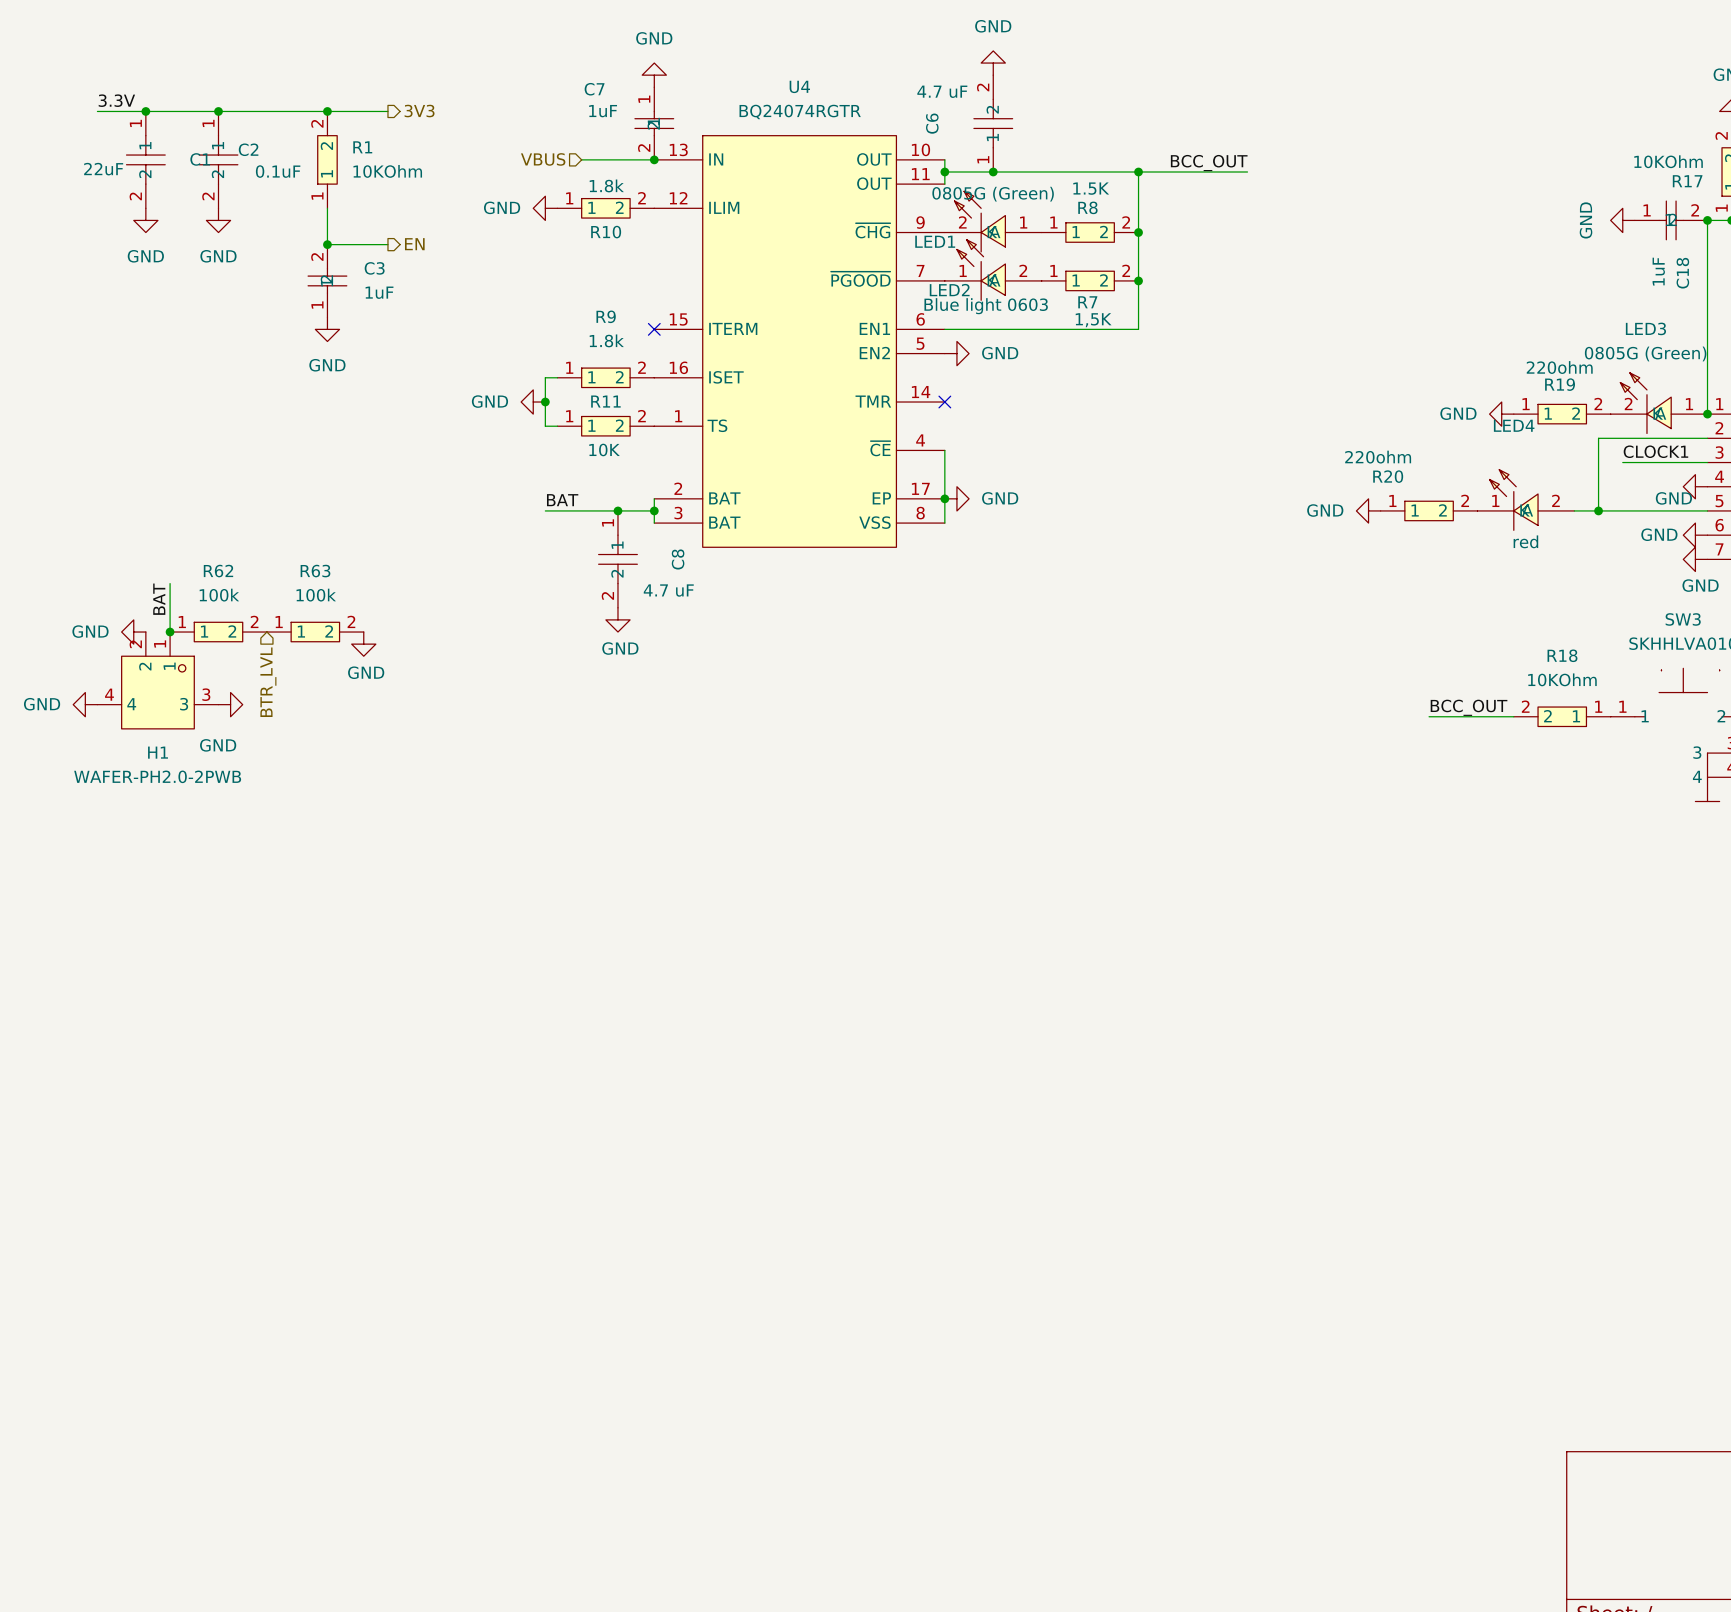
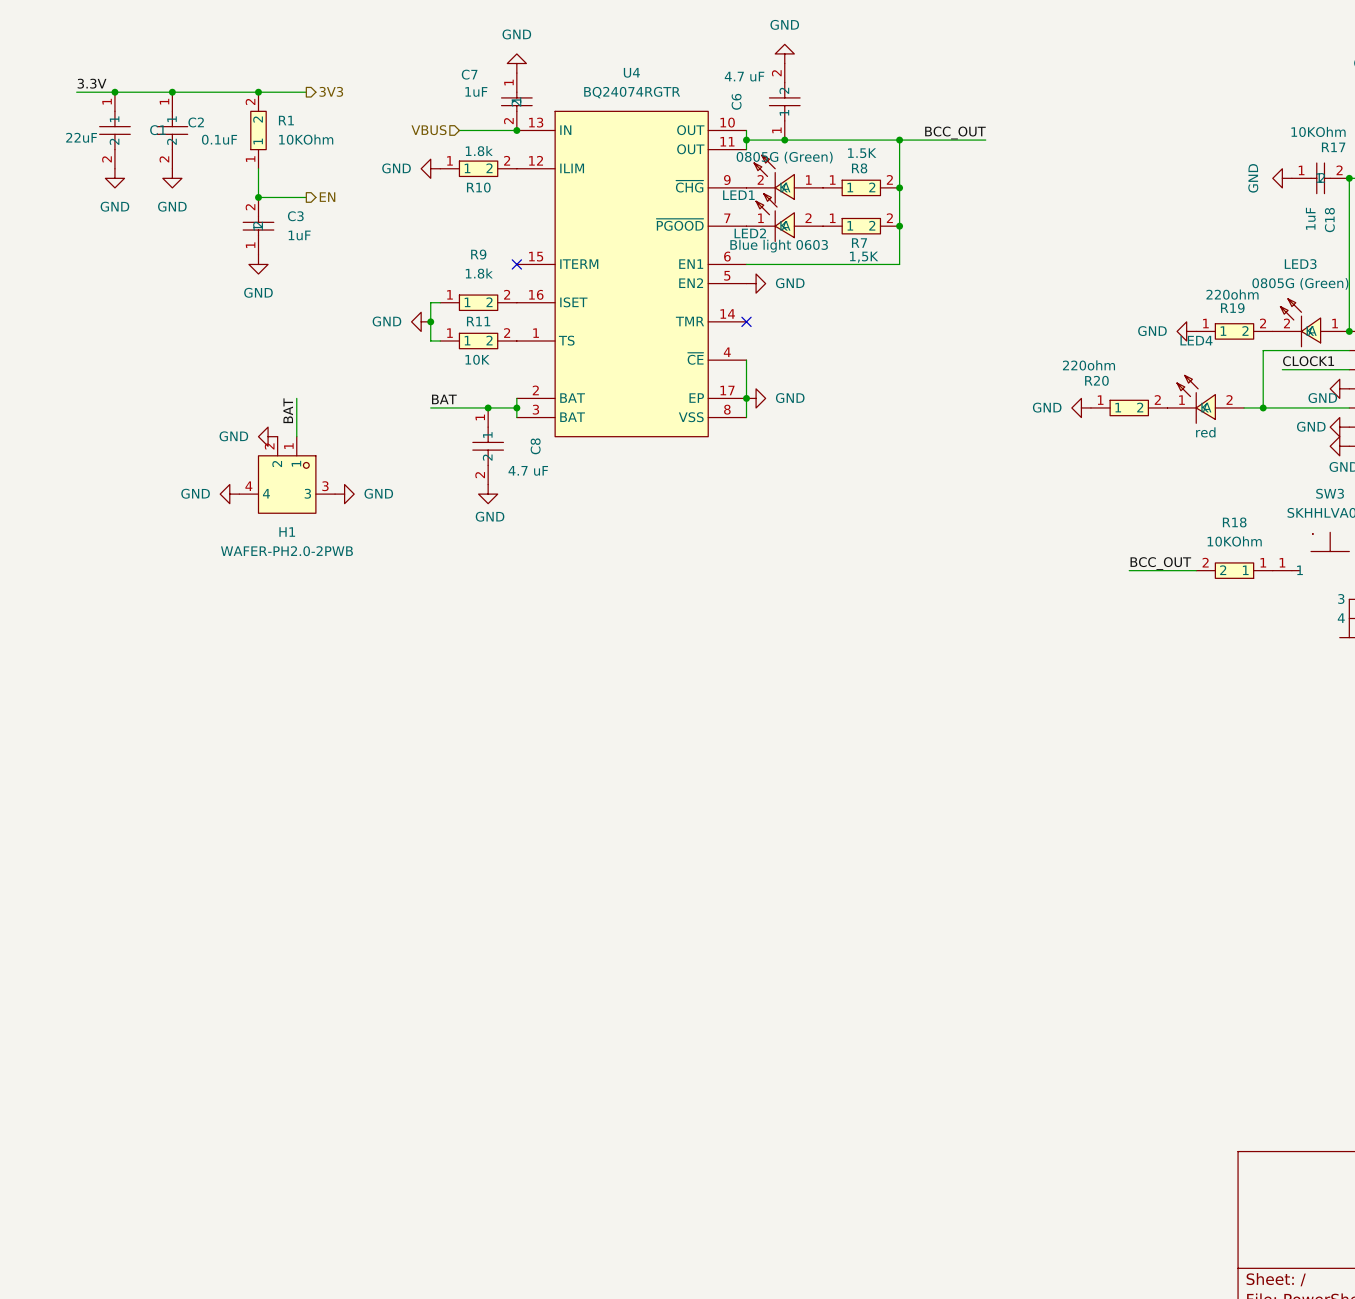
power symbol: none -> GND (268, 436)
wire: (170, 583) (170, 632) -> (296, 398) (296, 436)
label position: BAT (159, 599) -> BAT (288, 410)
power symbol: none -> GND (229, 494)
power symbol: none -> GND (344, 494)
power symbol: GND (133, 632) -> none
junction: (170, 632) -> none
R62: 100k (218, 632) -> none
R63: 100k (315, 632) -> none
power symbol: GND (363, 644) -> none
H1 position: (157, 680) -> (287, 474)
hierarchical label: BTR_LVL (268, 682) -> none
power symbol: GND (85, 704) -> none
power symbol: GND (230, 704) -> none

